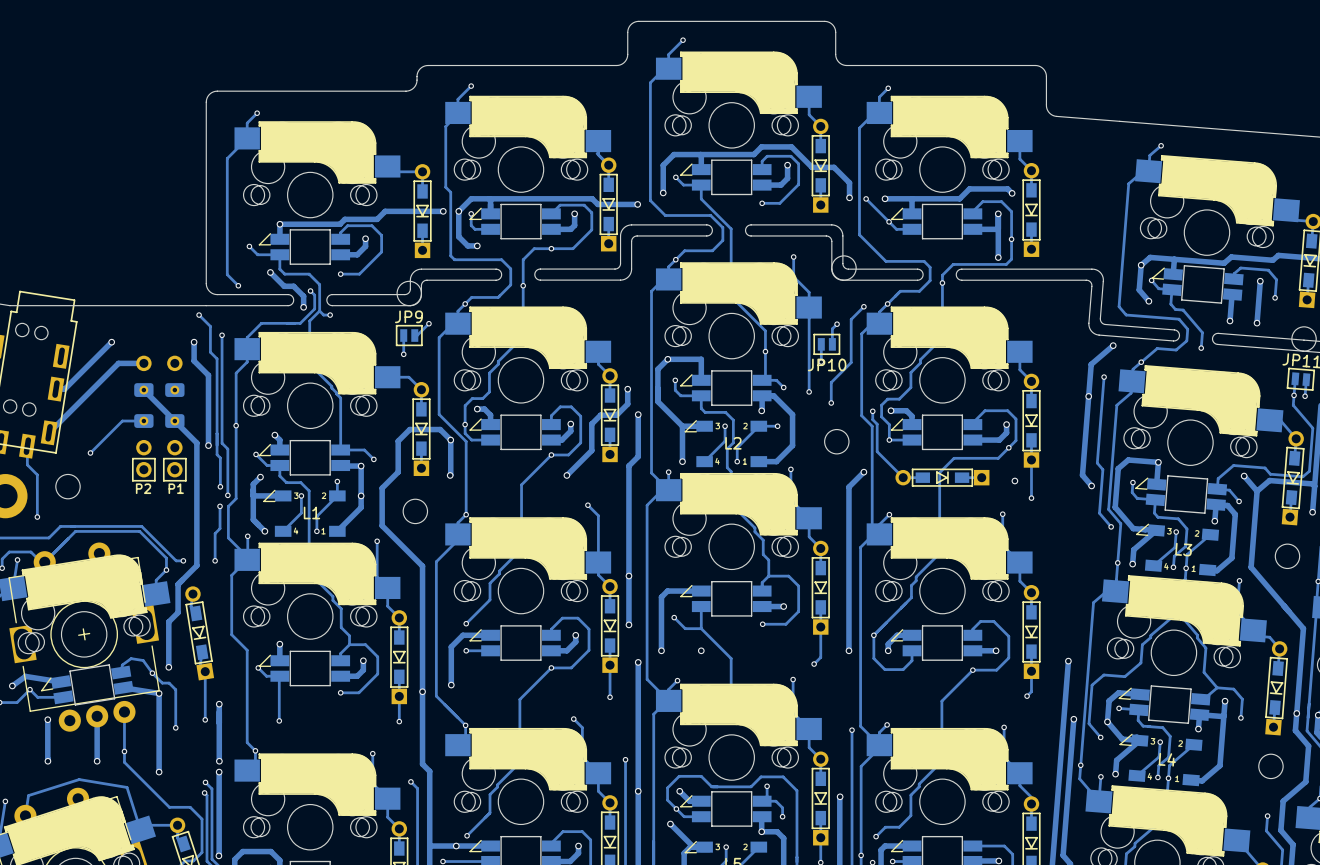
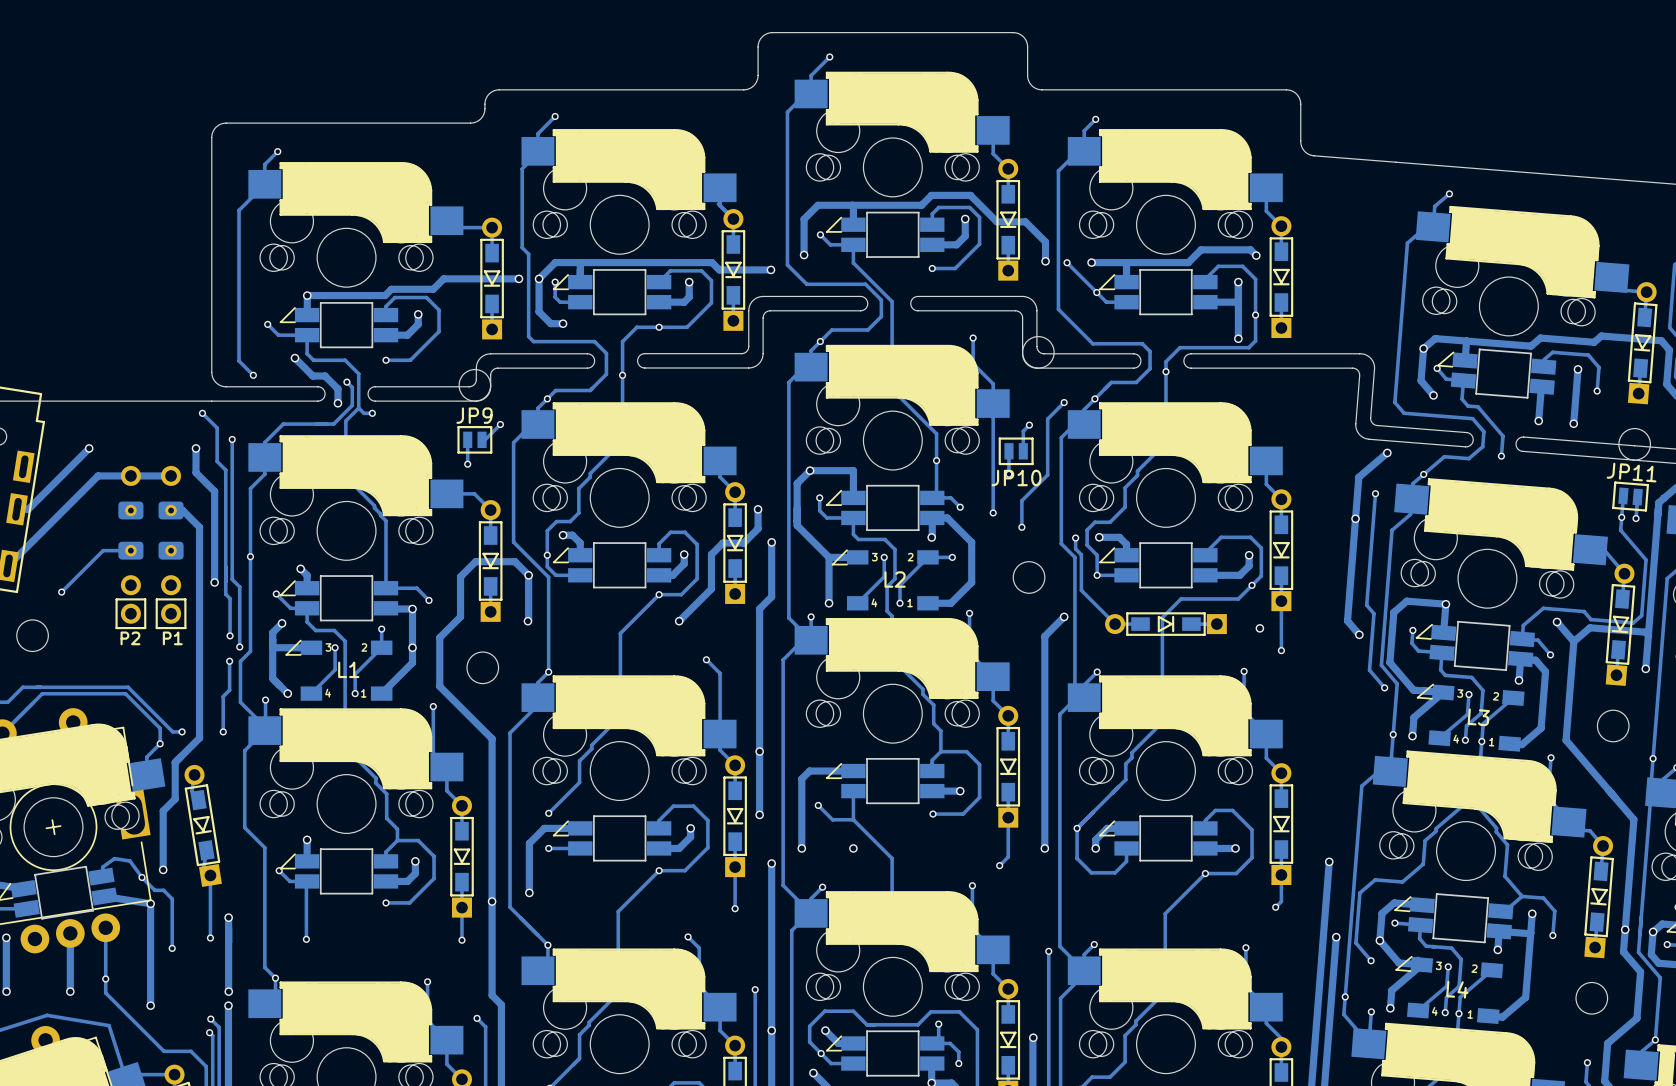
track: none -> (171, 475) (130, 475)
track: (143, 390) (196, 443) -> (171, 510) (182, 510) (199, 527) (199, 579)

